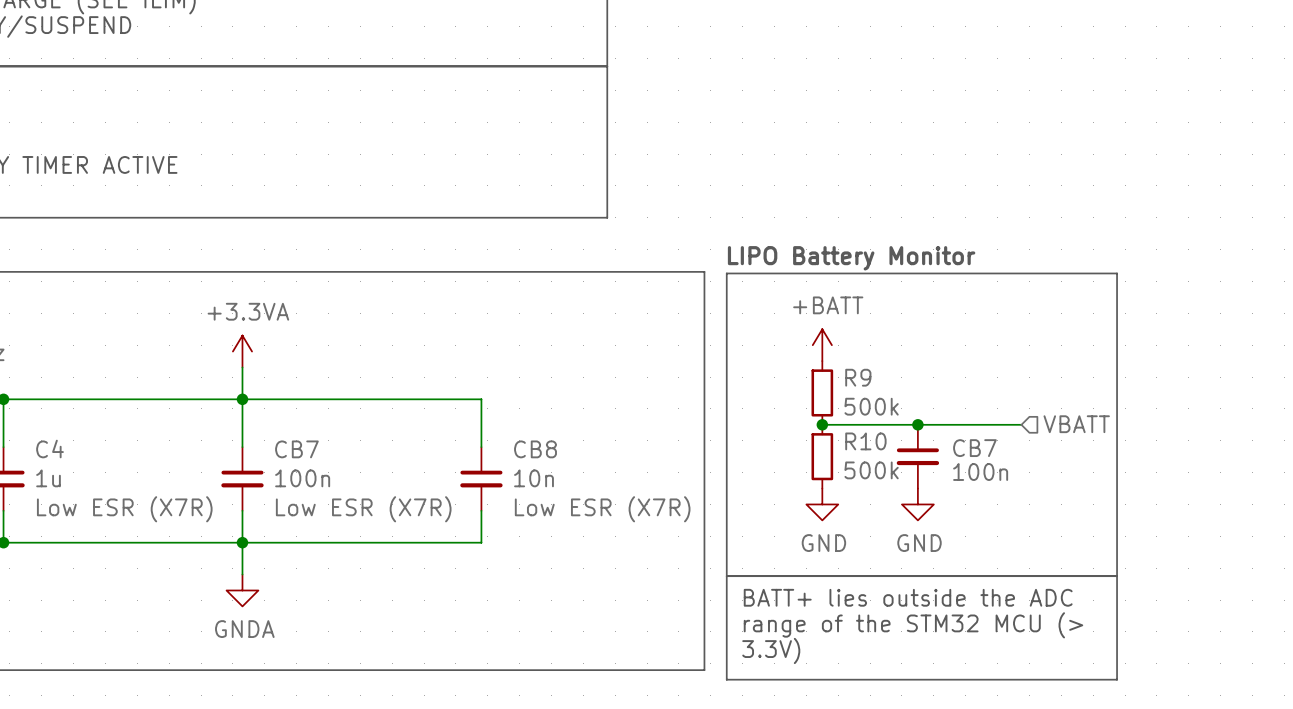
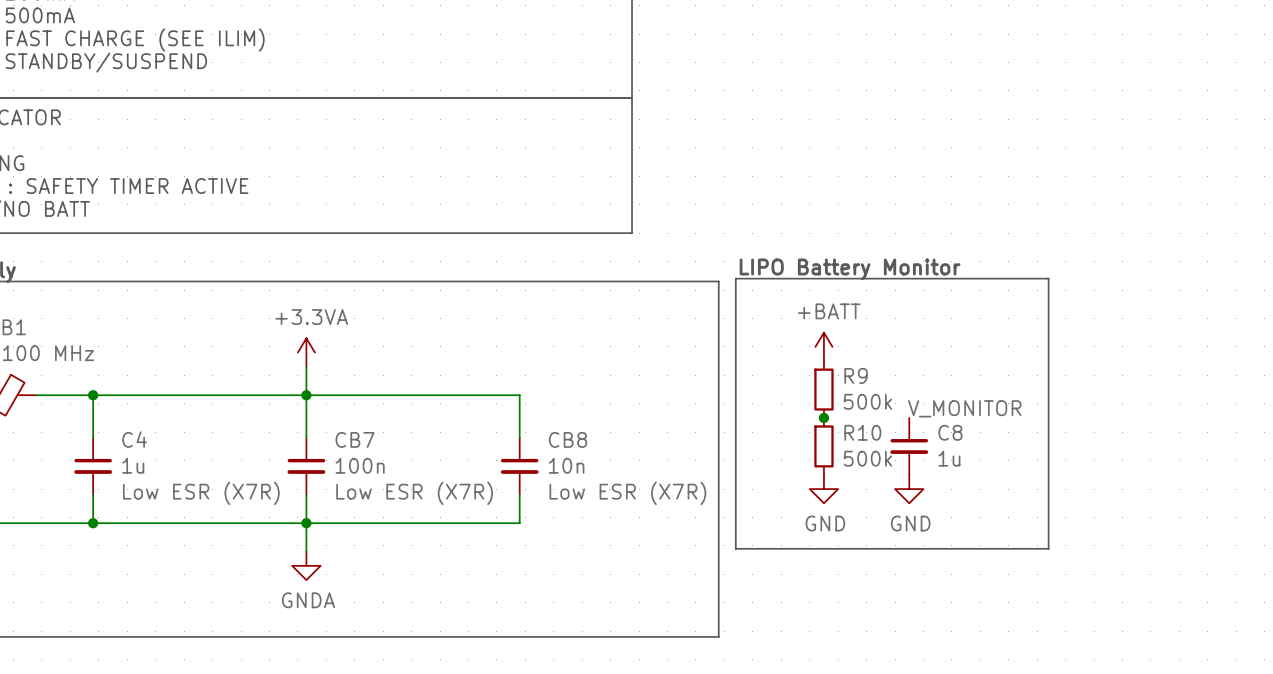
line: none -> (735, 278) (735, 548) (1048, 548) (1048, 278) (735, 278)
label: none -> V_MONITOR (964, 408)
wire: (822, 424) (1021, 424) -> none
junction: (917, 424) -> none
hierarchical label: VBATT (1076, 424) -> none
CB7 name: CB7 (974, 448) -> C8 (950, 432)
CB7 value: 100n (980, 472) -> 1u (949, 458)
line: (726, 576) (1117, 576) (1117, 679) (726, 679) (726, 273) (1117, 273) (1117, 576) -> none
text: BATT+ lies outside the ADC (908, 597) -> none
text: range of the STM32 MCU (> (913, 625) -> none
text: 3.3V) (771, 650) -> none

